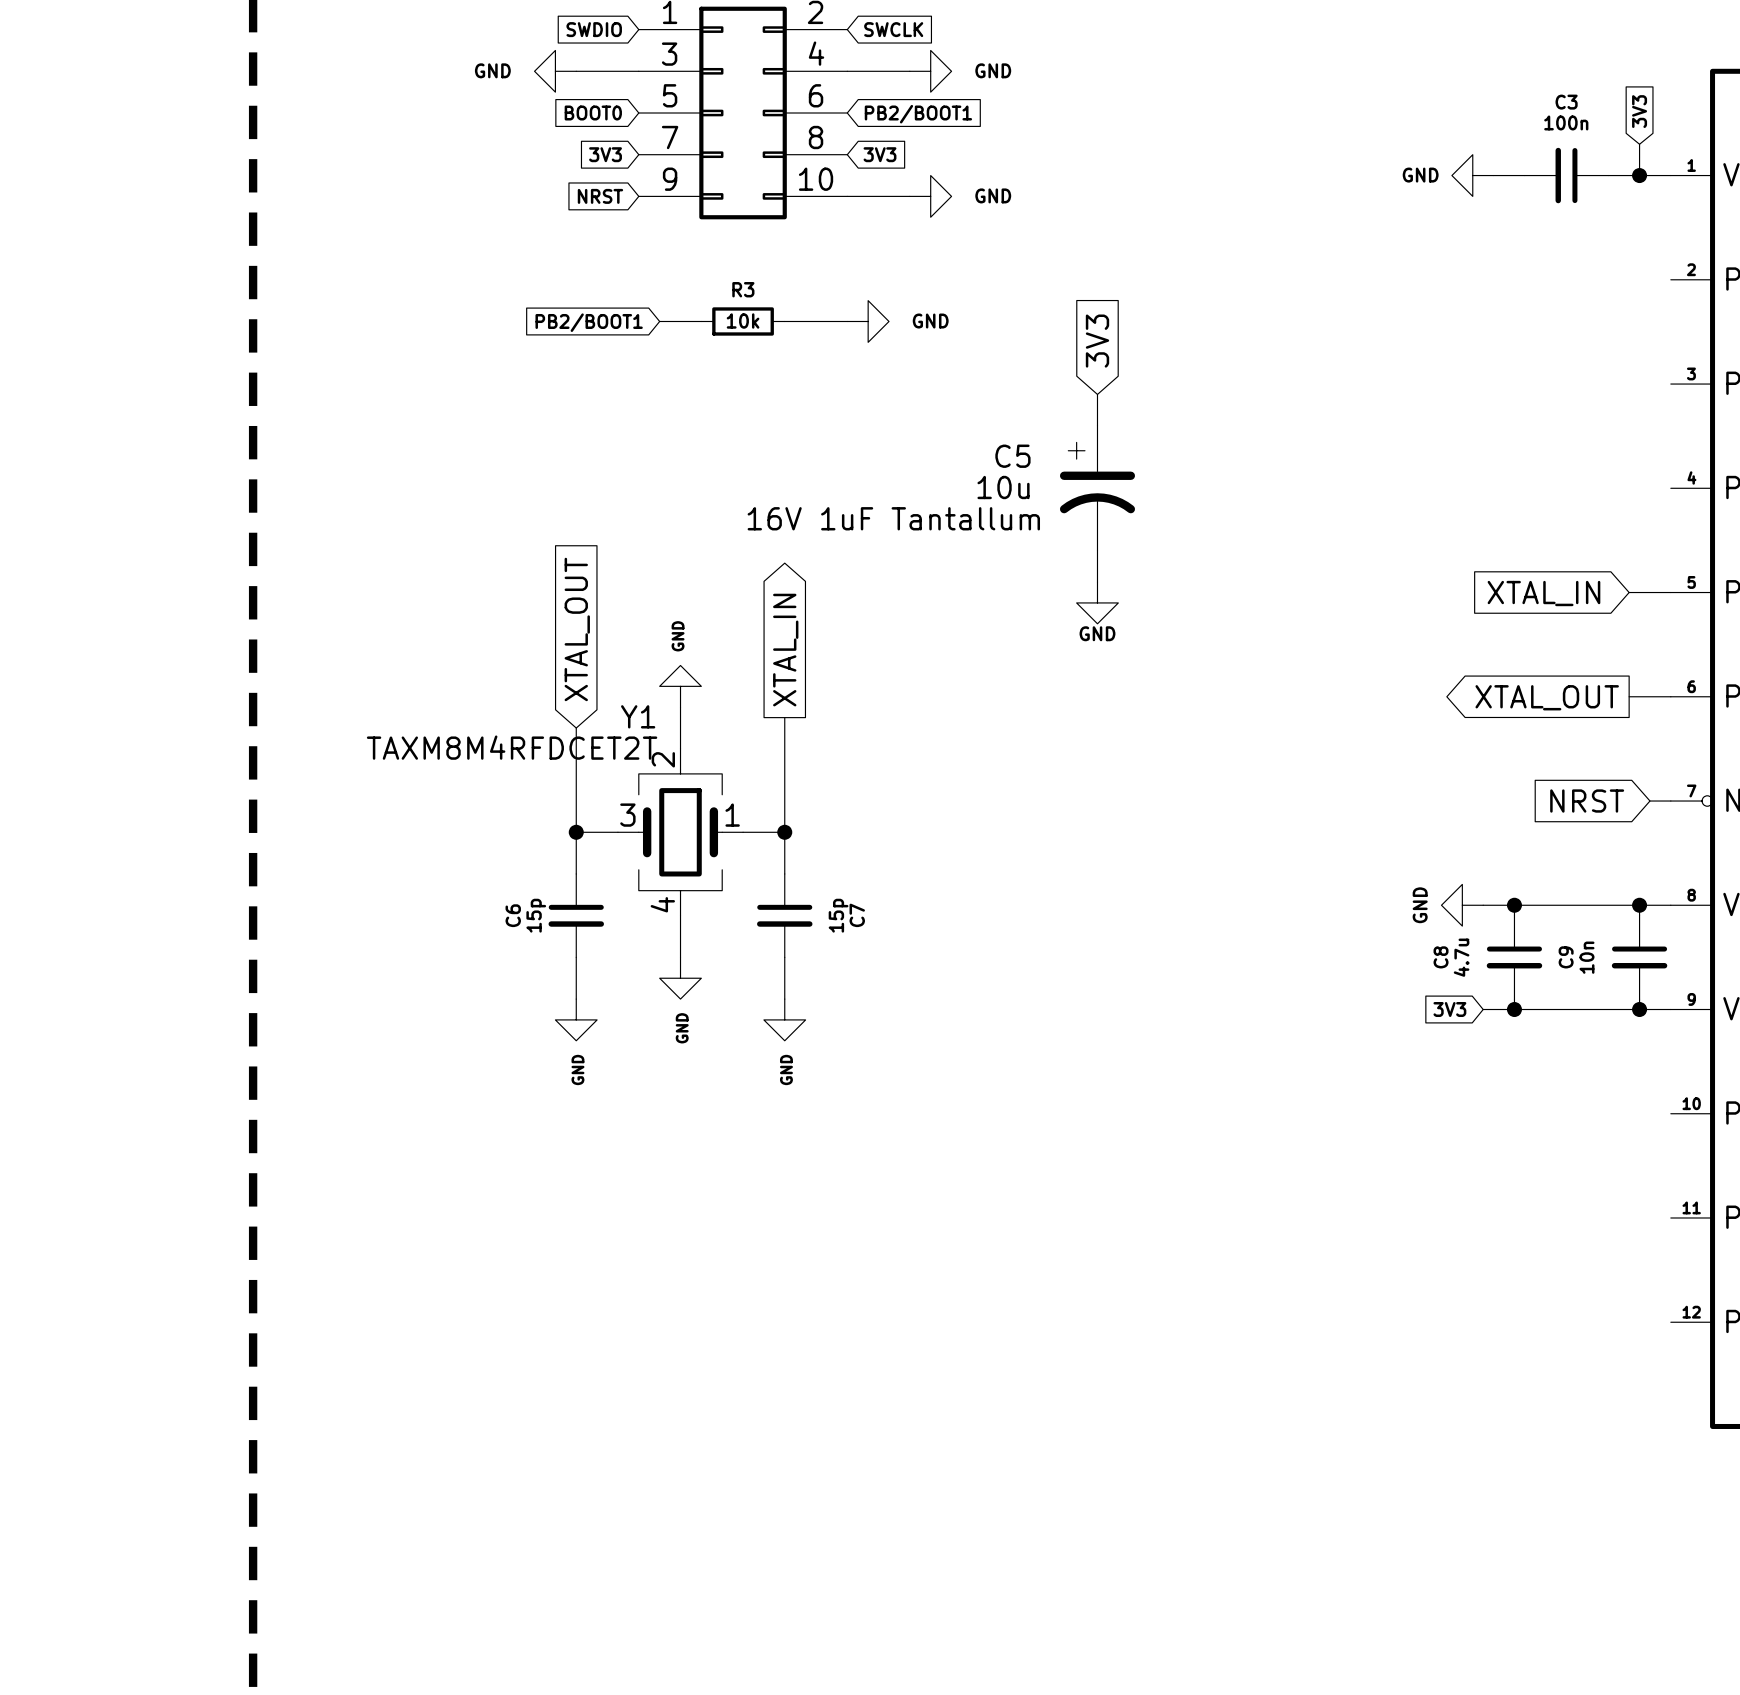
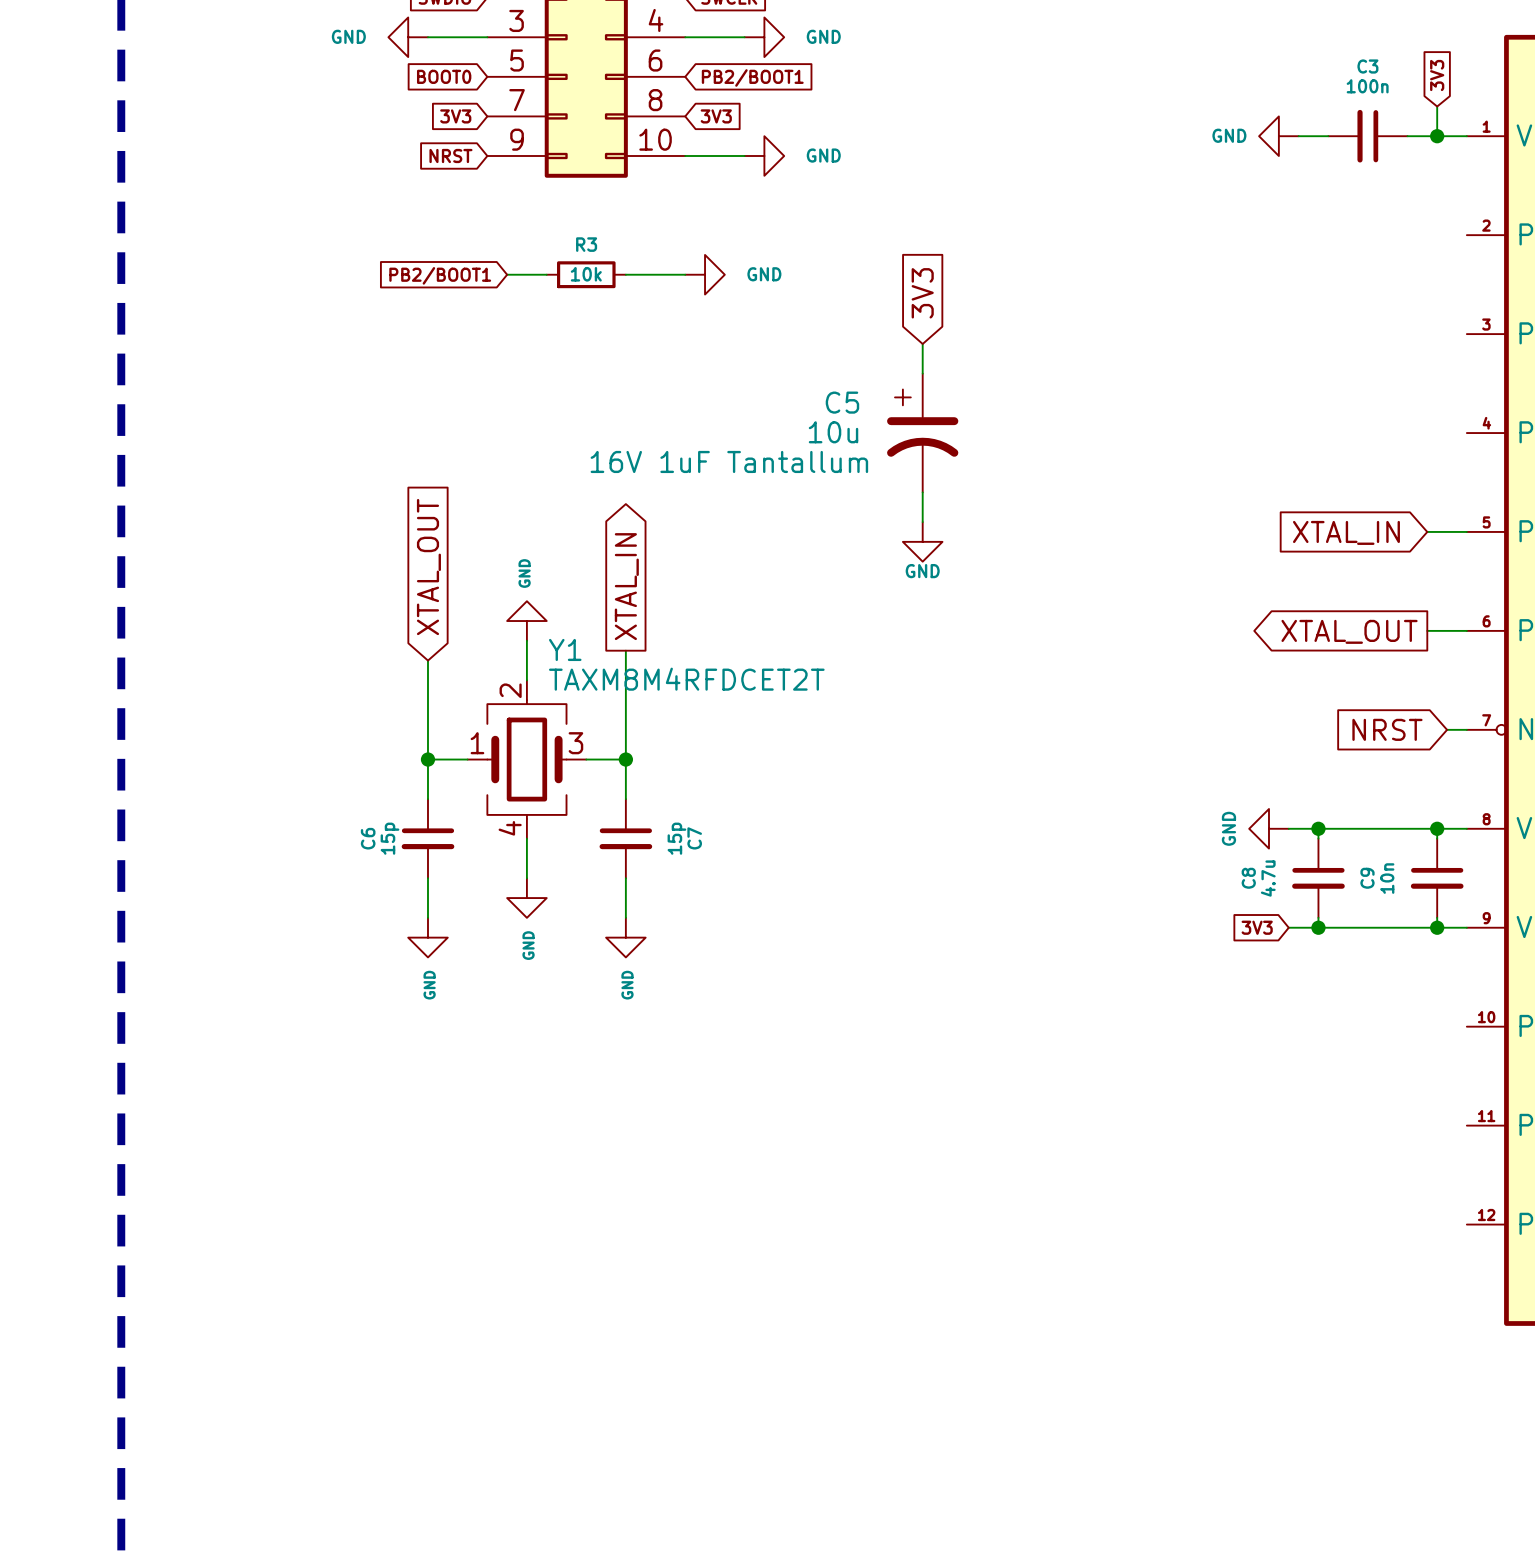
Y1 flip: as is (680, 832) -> left-right (526, 759)

